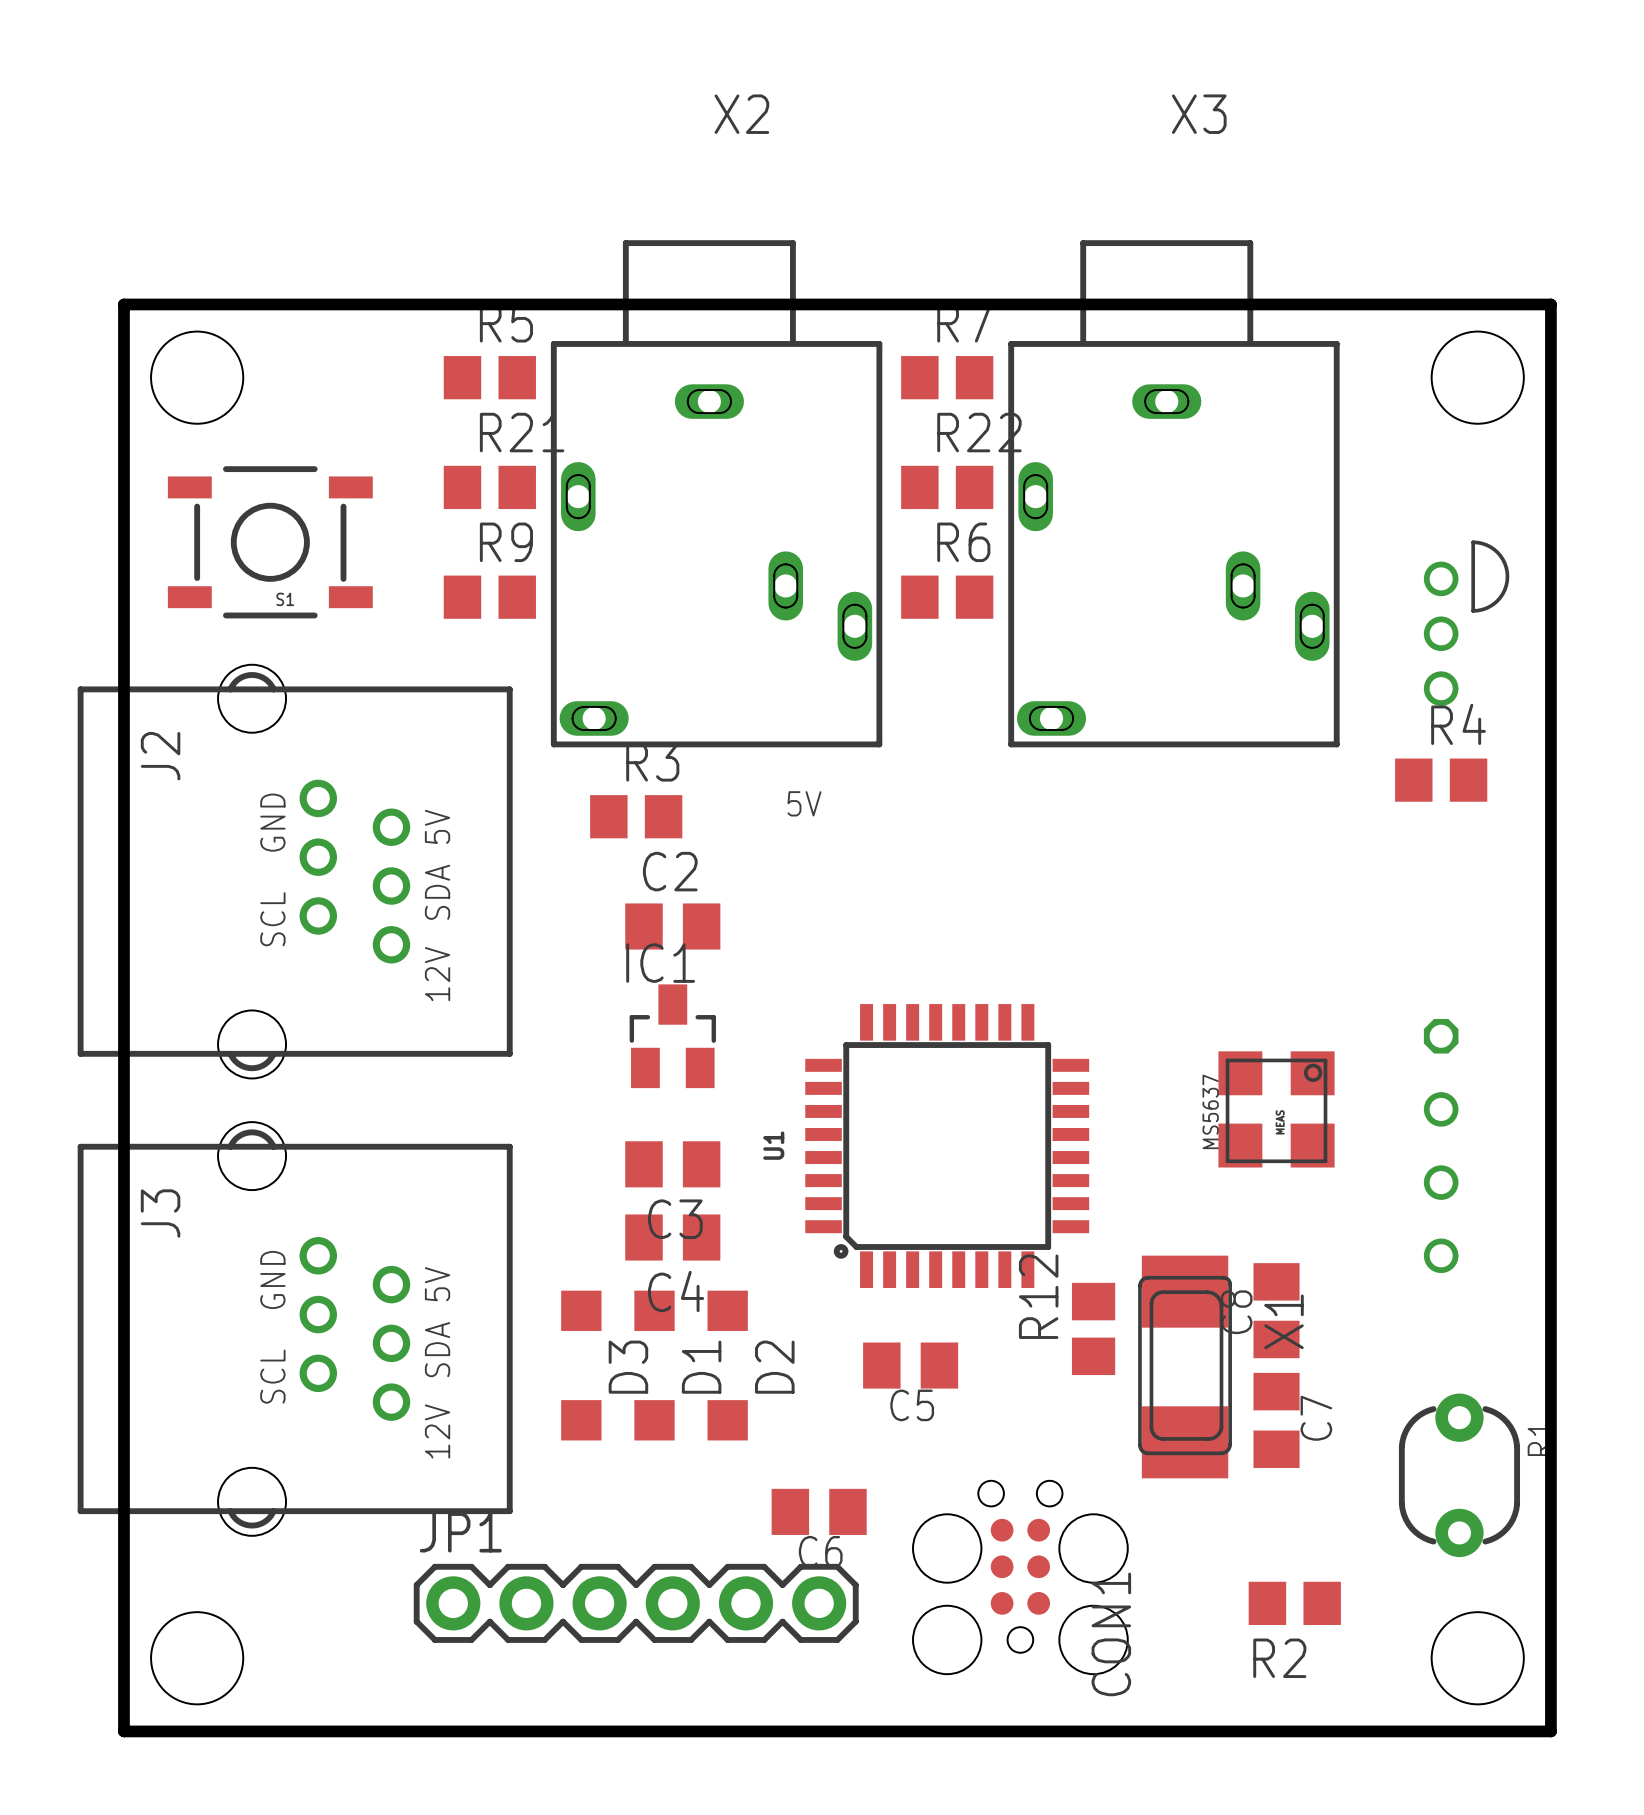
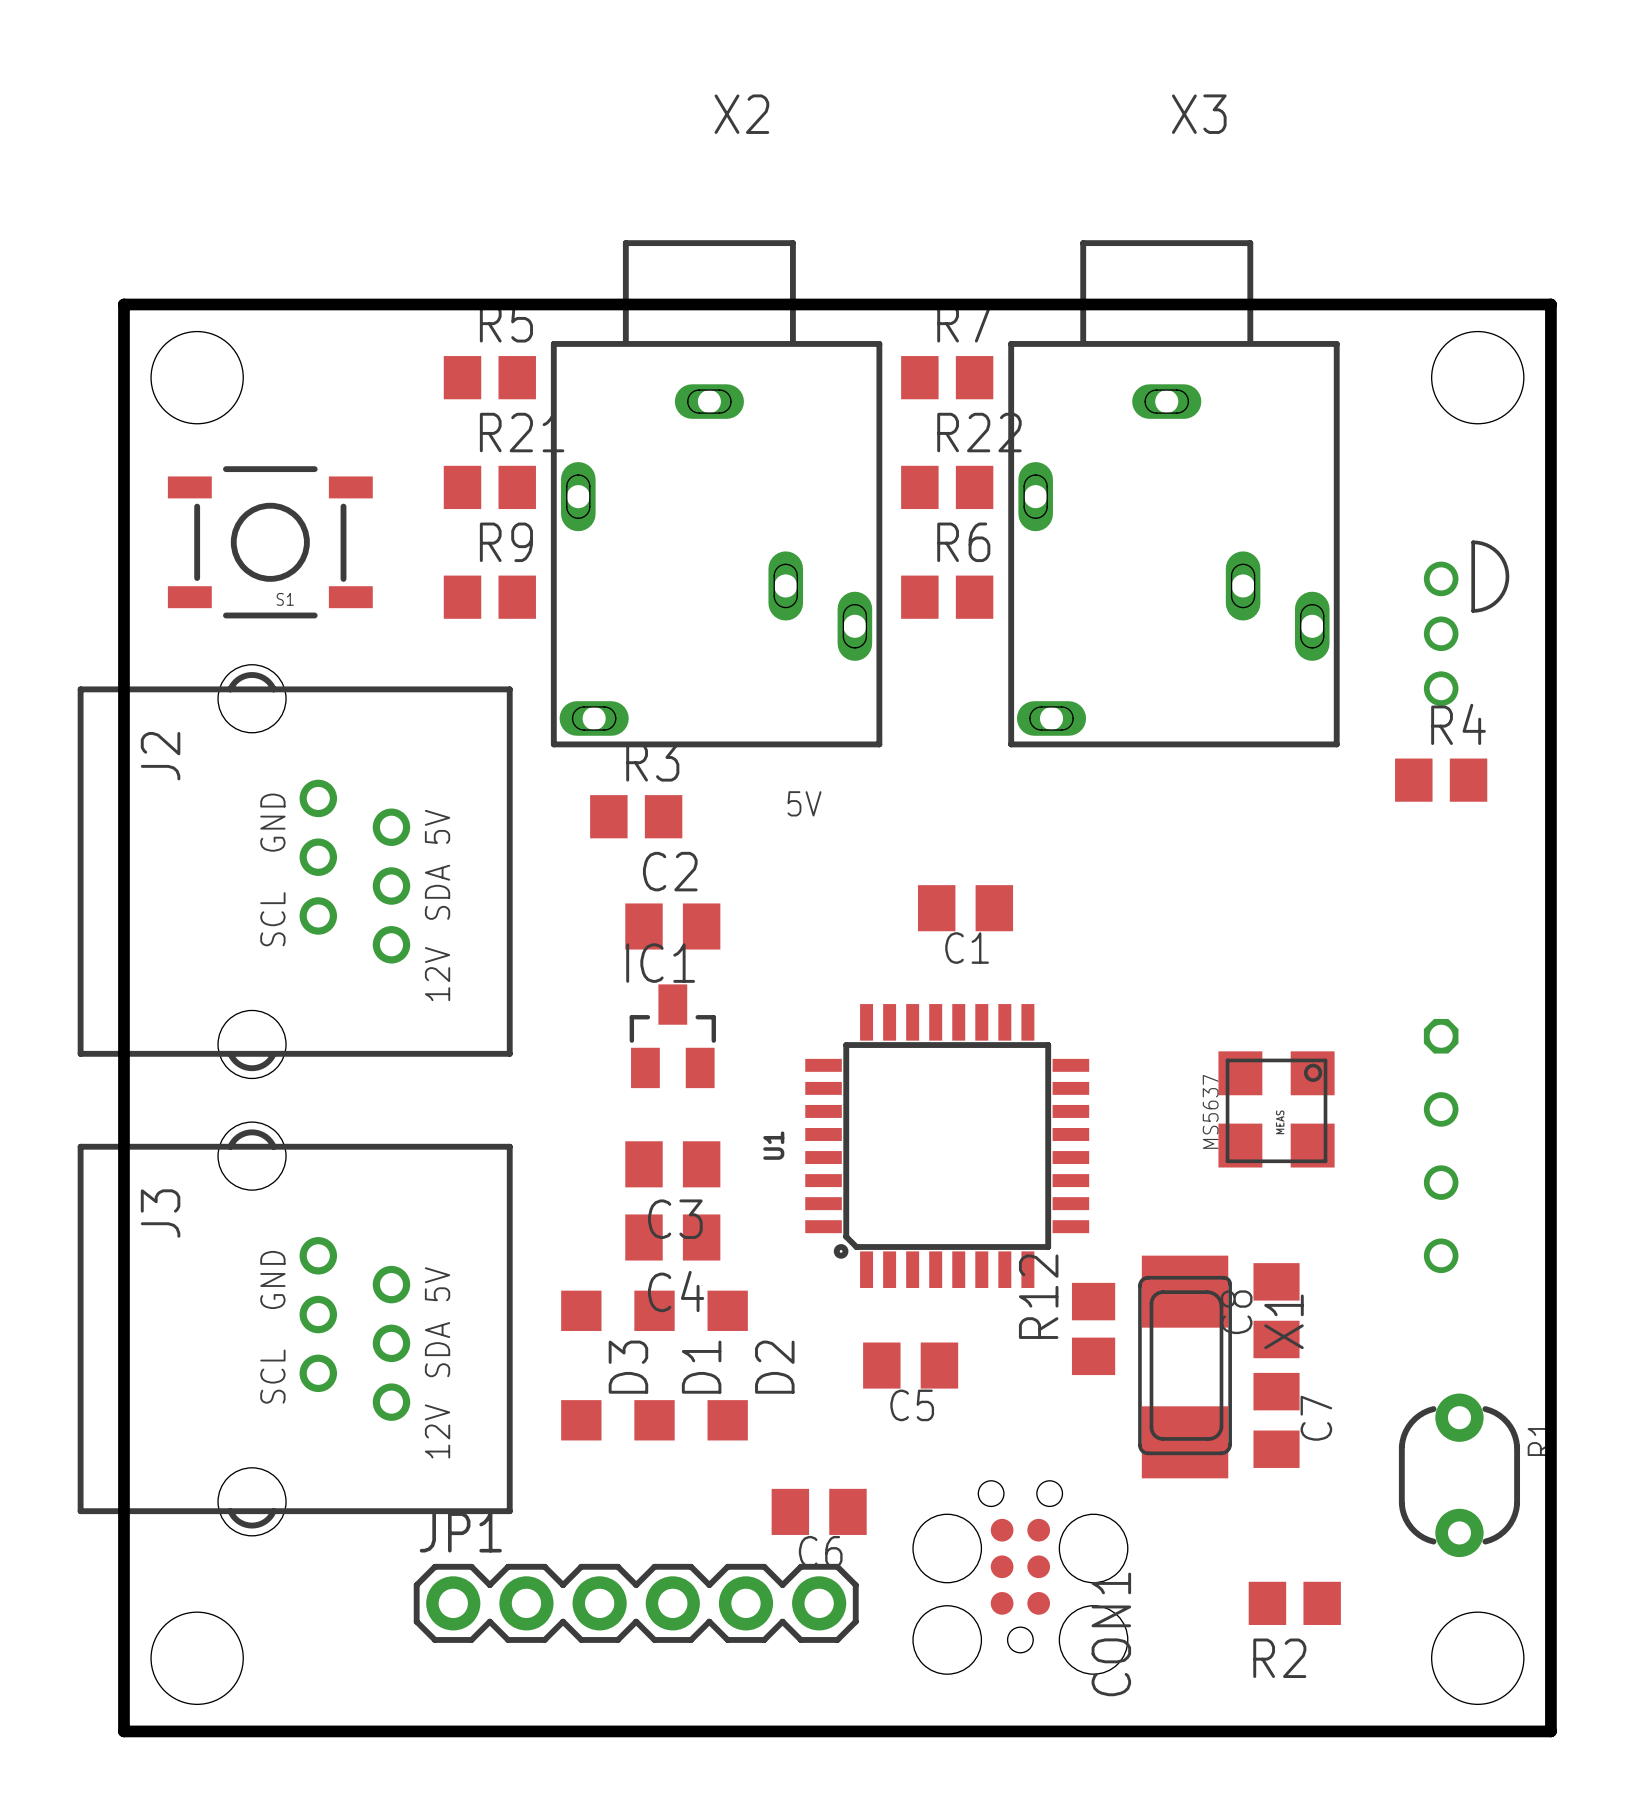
C1: none -> (965, 908)

